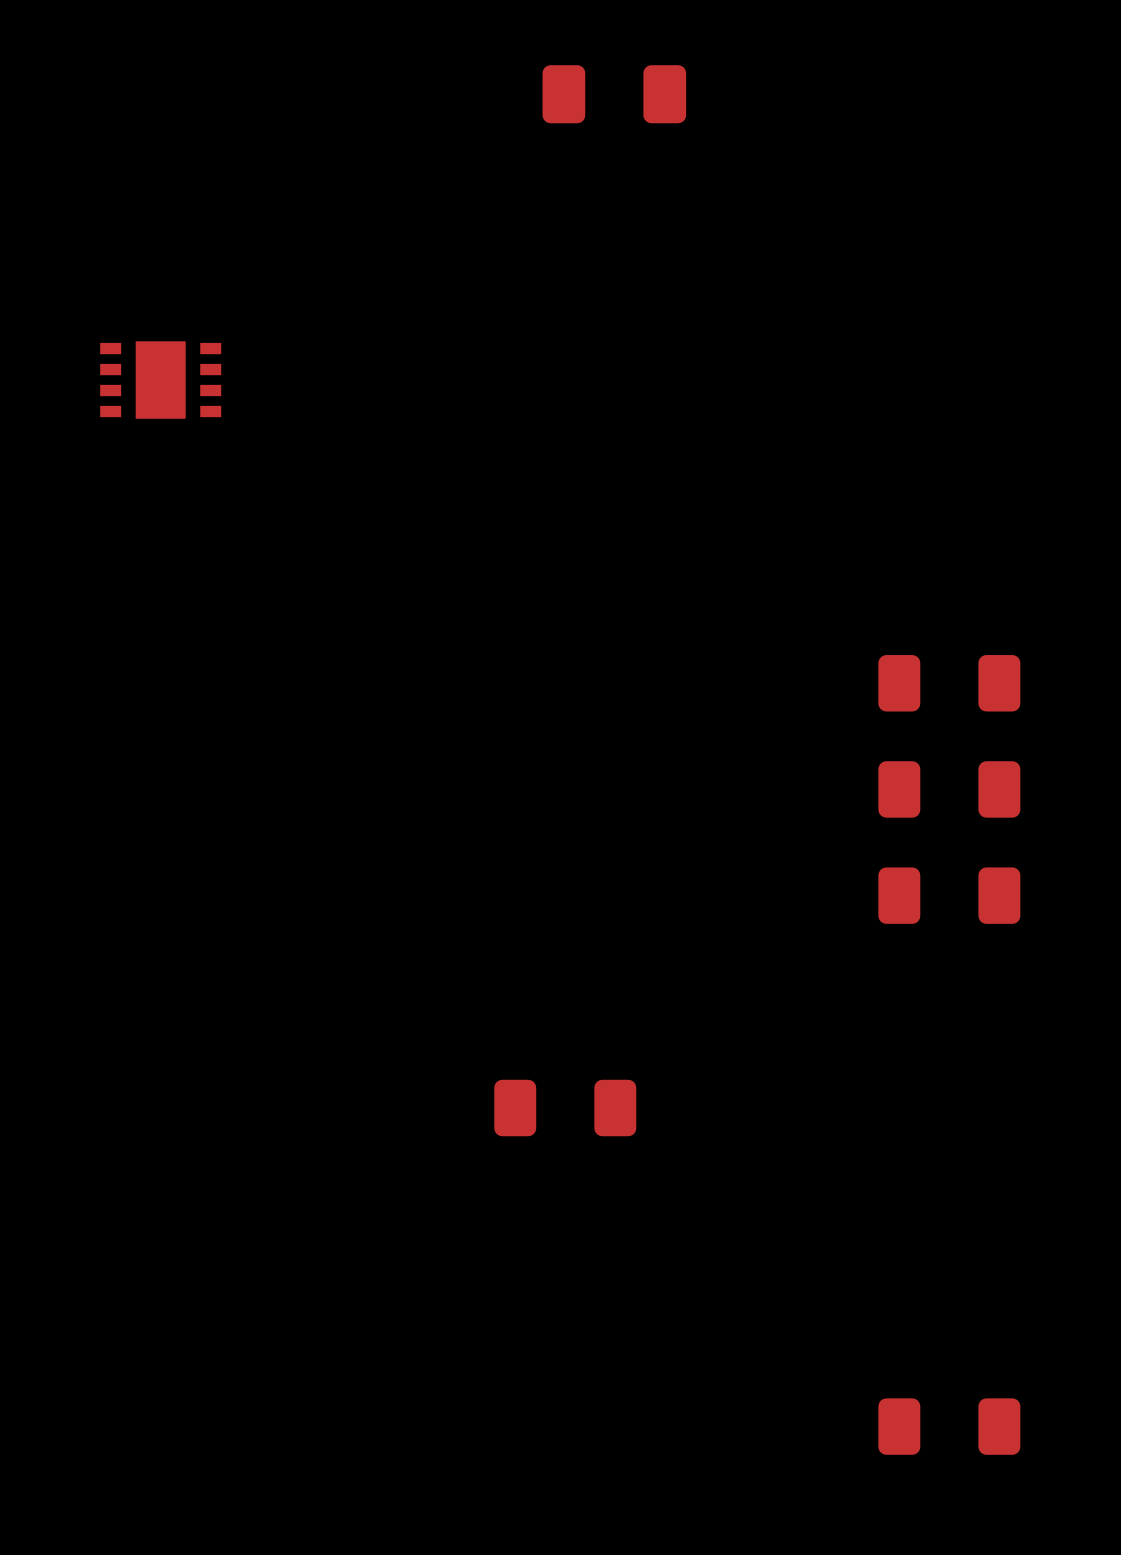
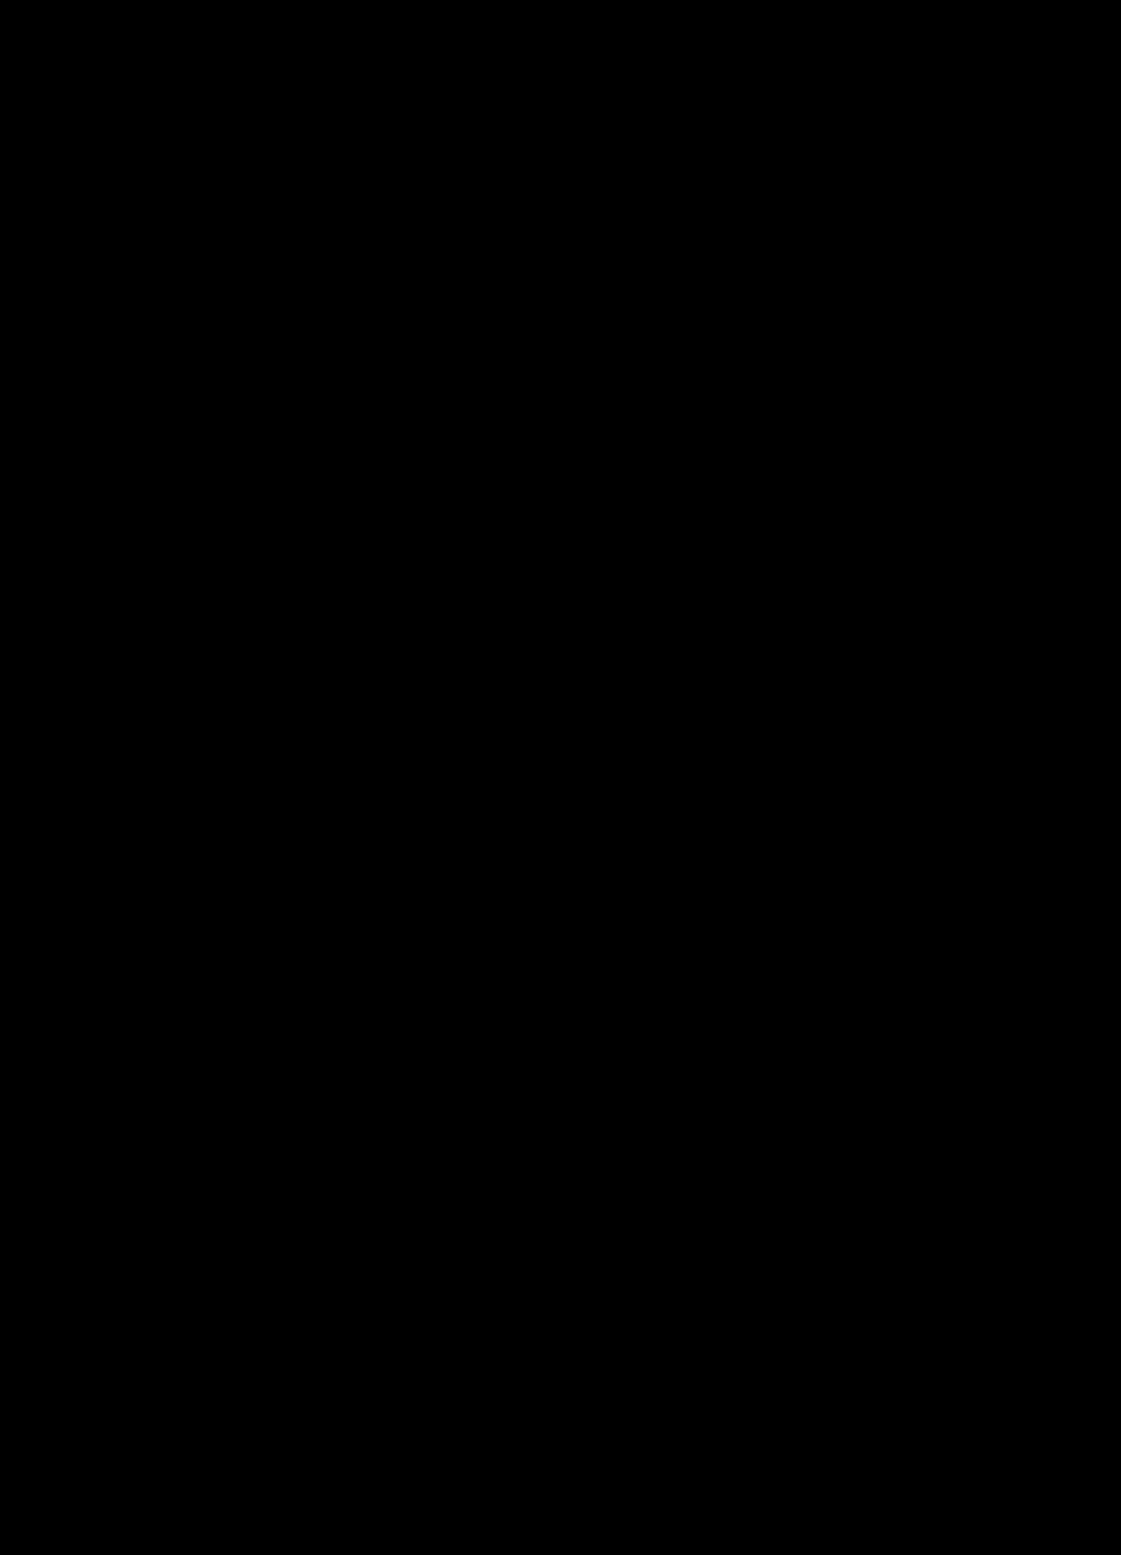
part: (614, 94) -> none
part: (160, 380) -> none
part: (949, 683) -> none
part: (949, 789) -> none
part: (949, 895) -> none
part: (565, 1108) -> none
part: (949, 1426) -> none

